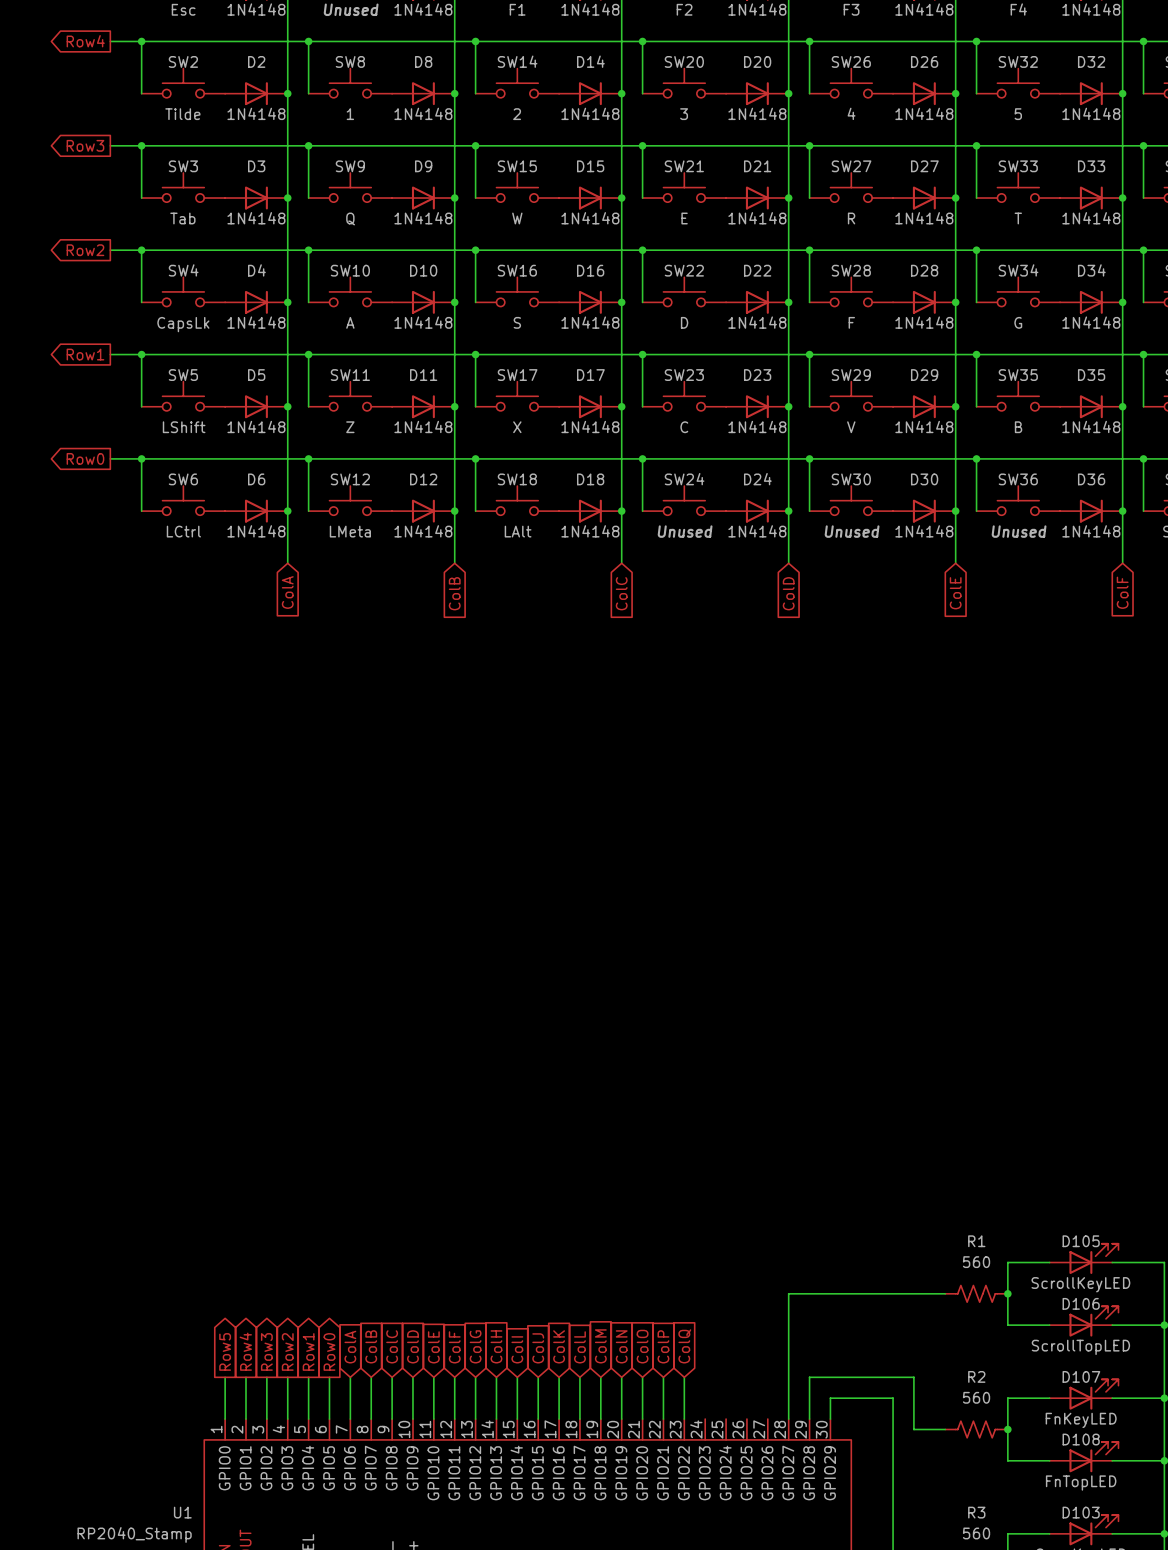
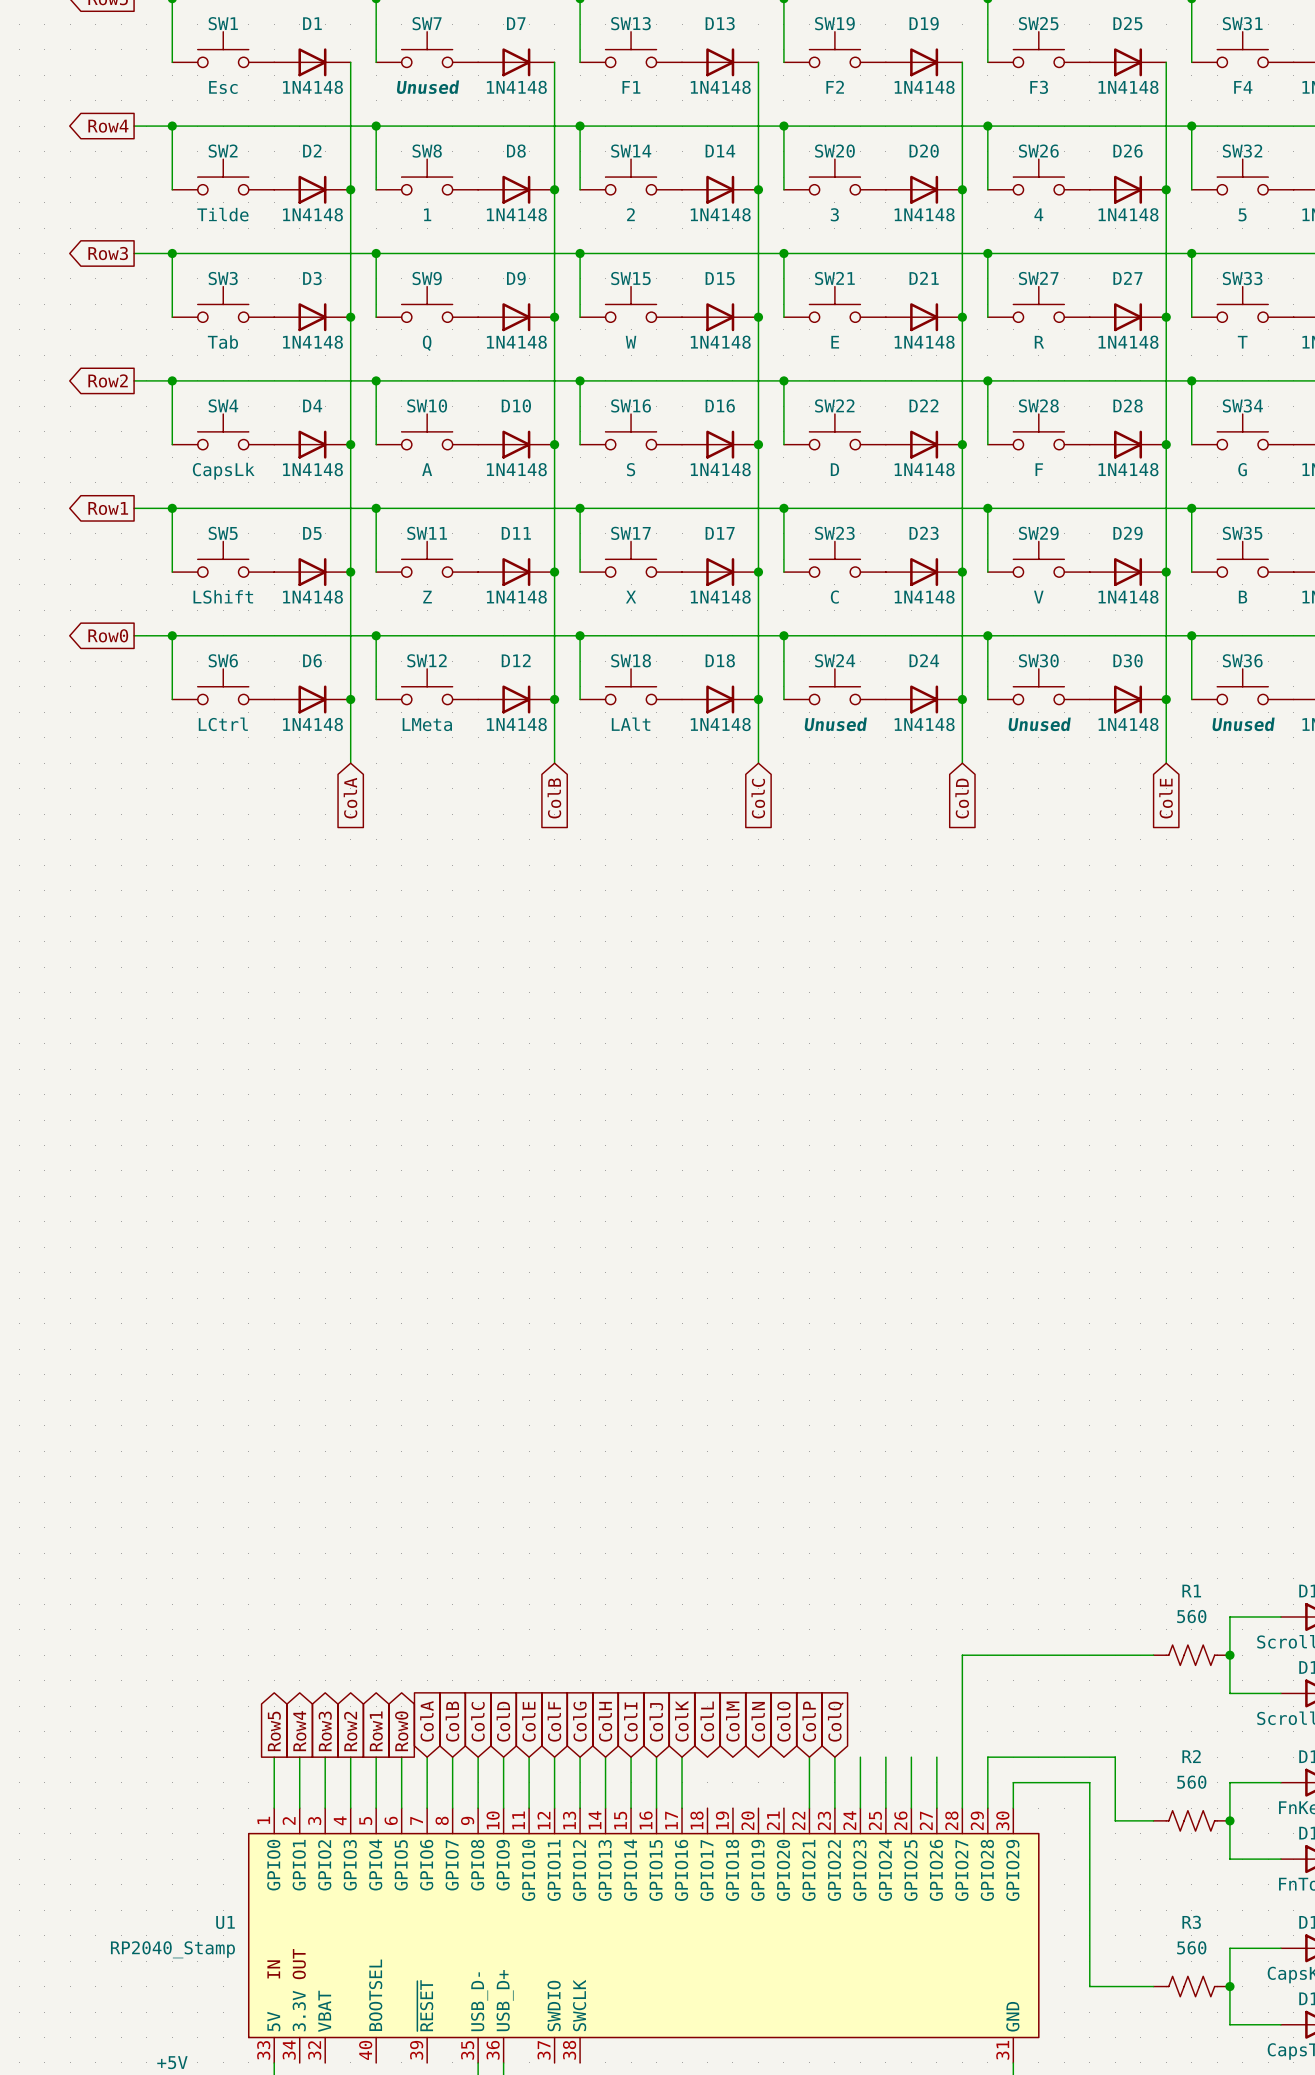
wire: (579, 1377) (579, 1419) -> (860, 1757) (860, 1808)
wire: (600, 1377) (600, 1419) -> (885, 1757) (885, 1808)
wire: (621, 1377) (621, 1419) -> (911, 1757) (911, 1808)
wire: (642, 1377) (642, 1419) -> (936, 1757) (936, 1808)

